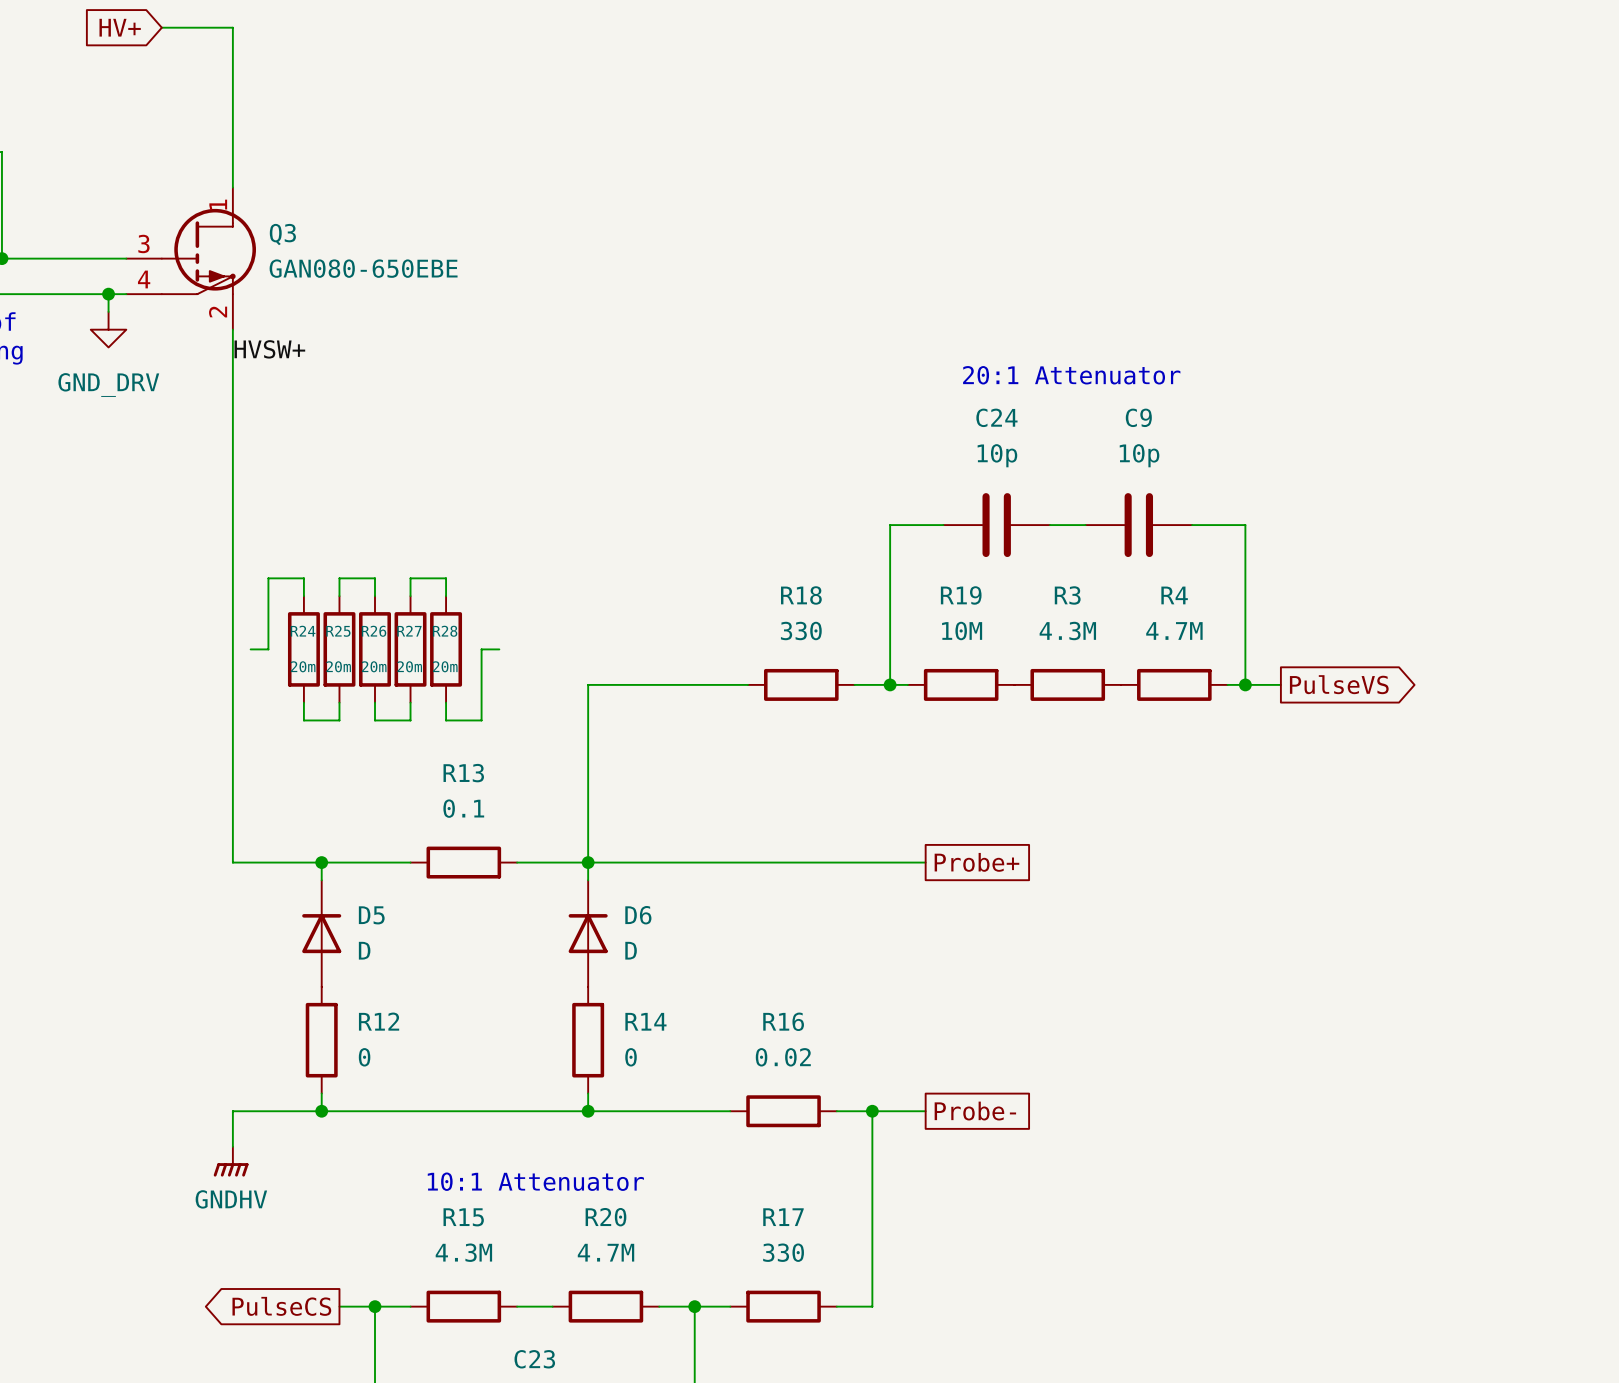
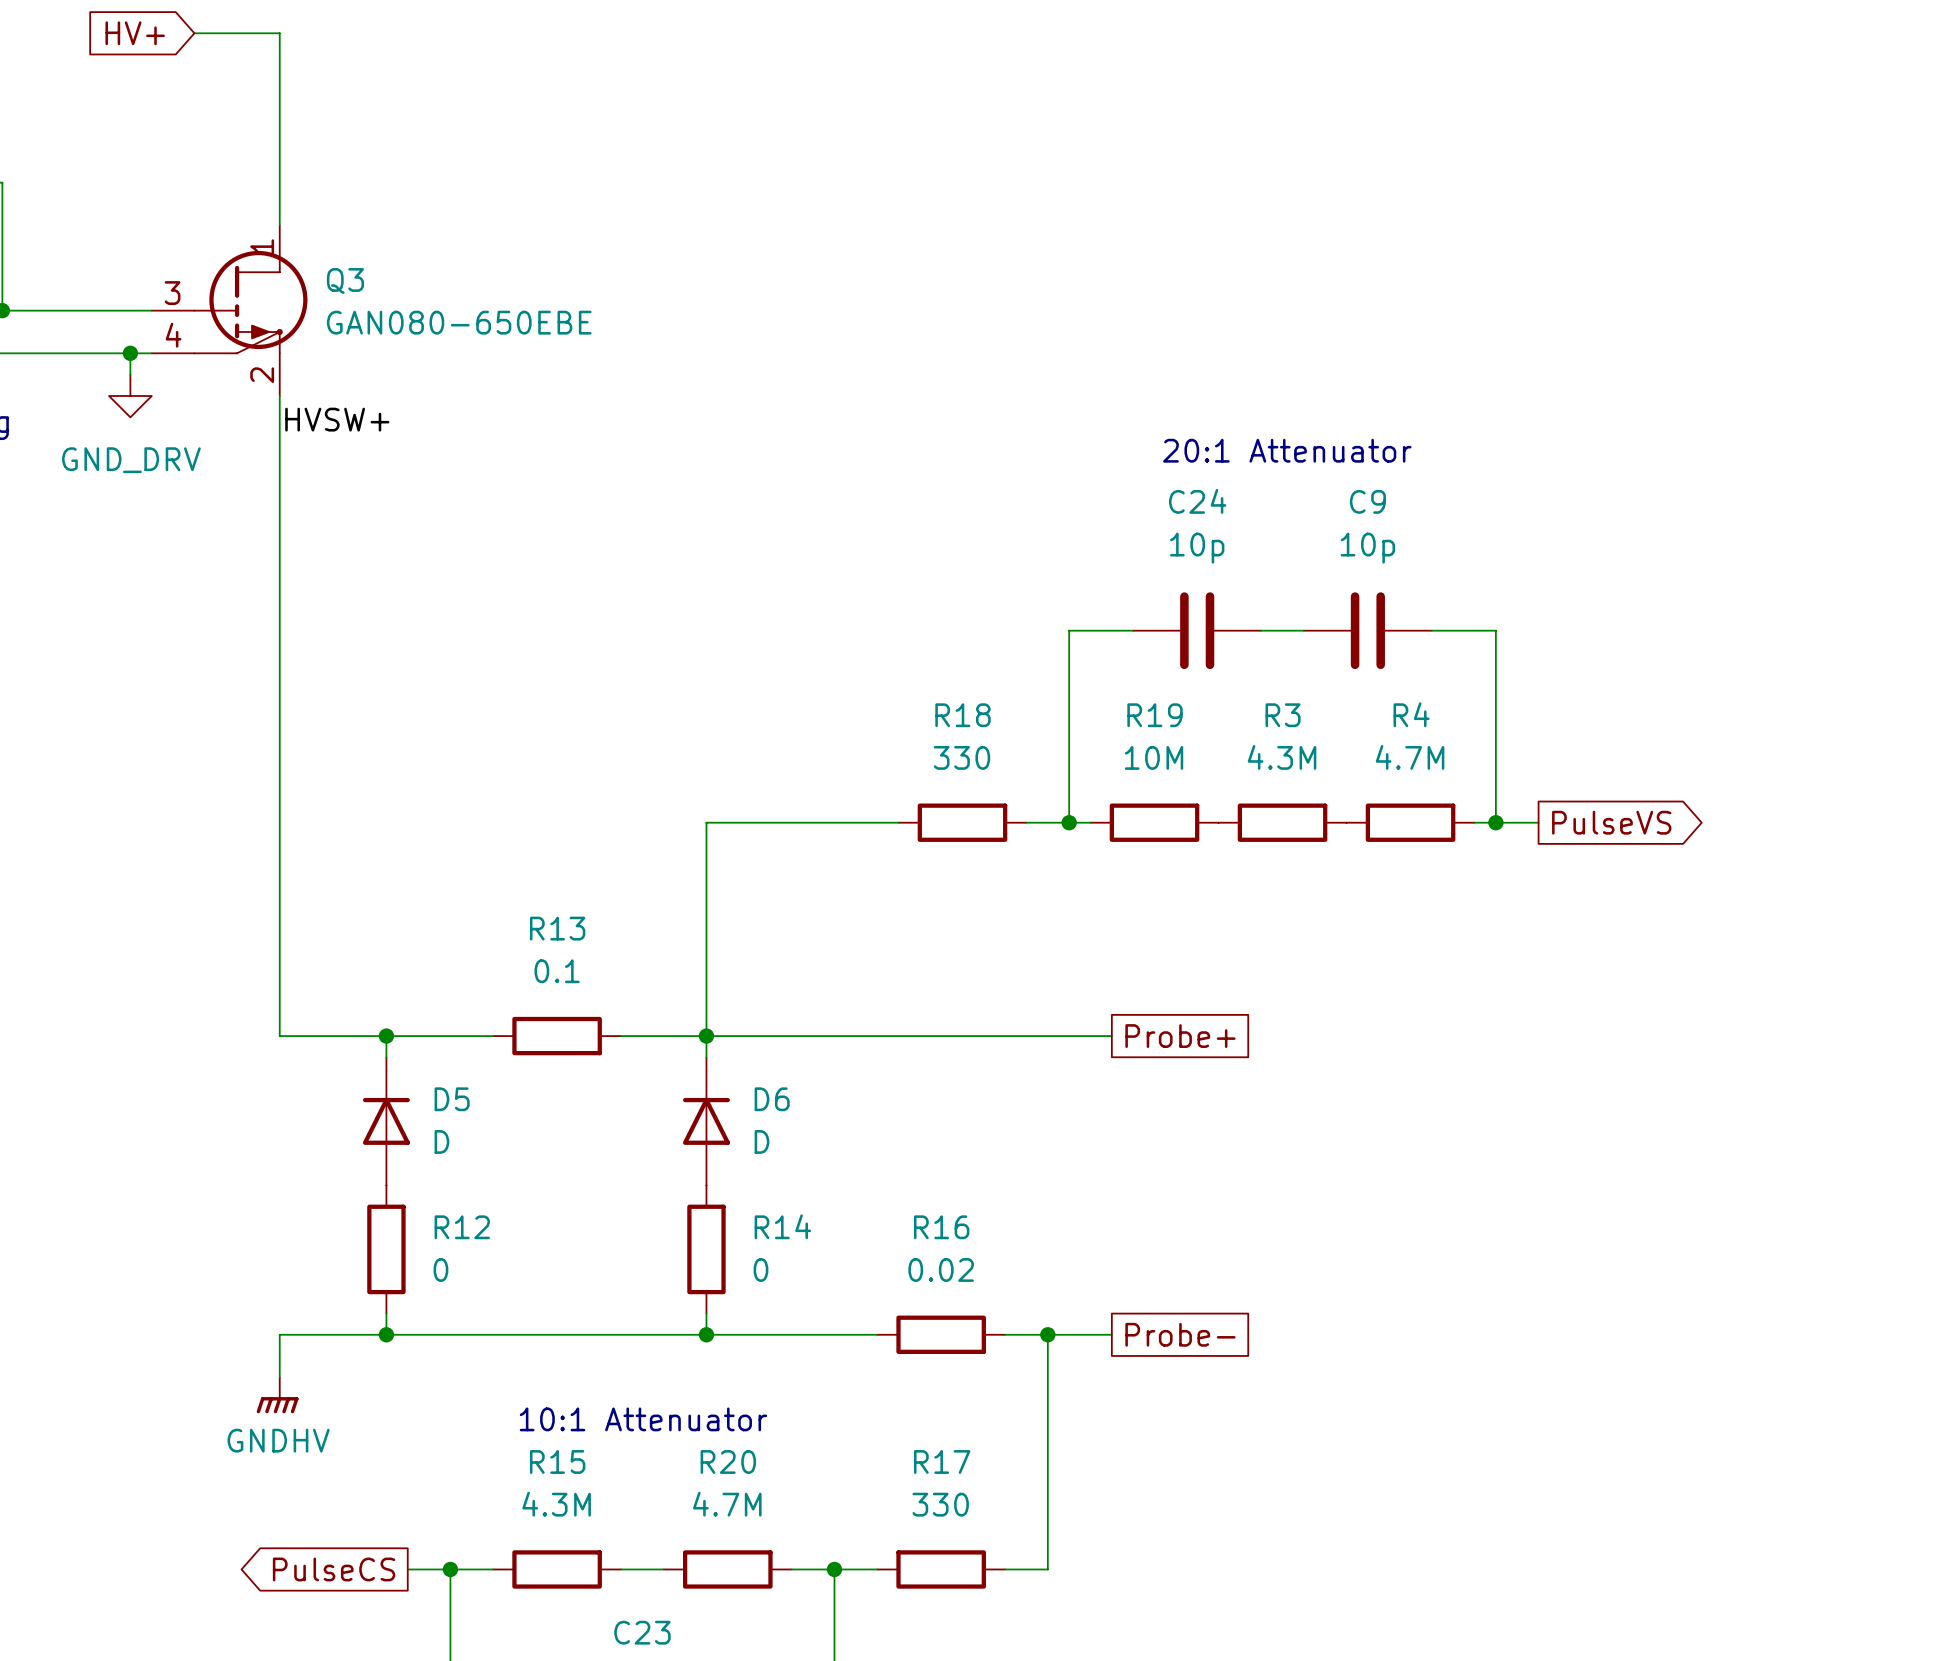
wire: (303, 596) (303, 578) (268, 578) (268, 649) (250, 649) -> none
wire: (339, 596) (339, 578) (375, 578) (375, 596) -> none
wire: (410, 596) (410, 578) (446, 578) (446, 596) -> none
R24: 20m (303, 649) -> none
R25: 20m (339, 649) -> none
R26: 20m (375, 649) -> none
R27: 20m (410, 649) -> none
R28: 20m (446, 649) -> none
wire: (499, 649) (481, 649) (481, 720) (446, 720) (446, 702) -> none
wire: (303, 702) (303, 720) (339, 720) (339, 702) -> none
wire: (375, 702) (375, 720) (410, 720) (410, 702) -> none

